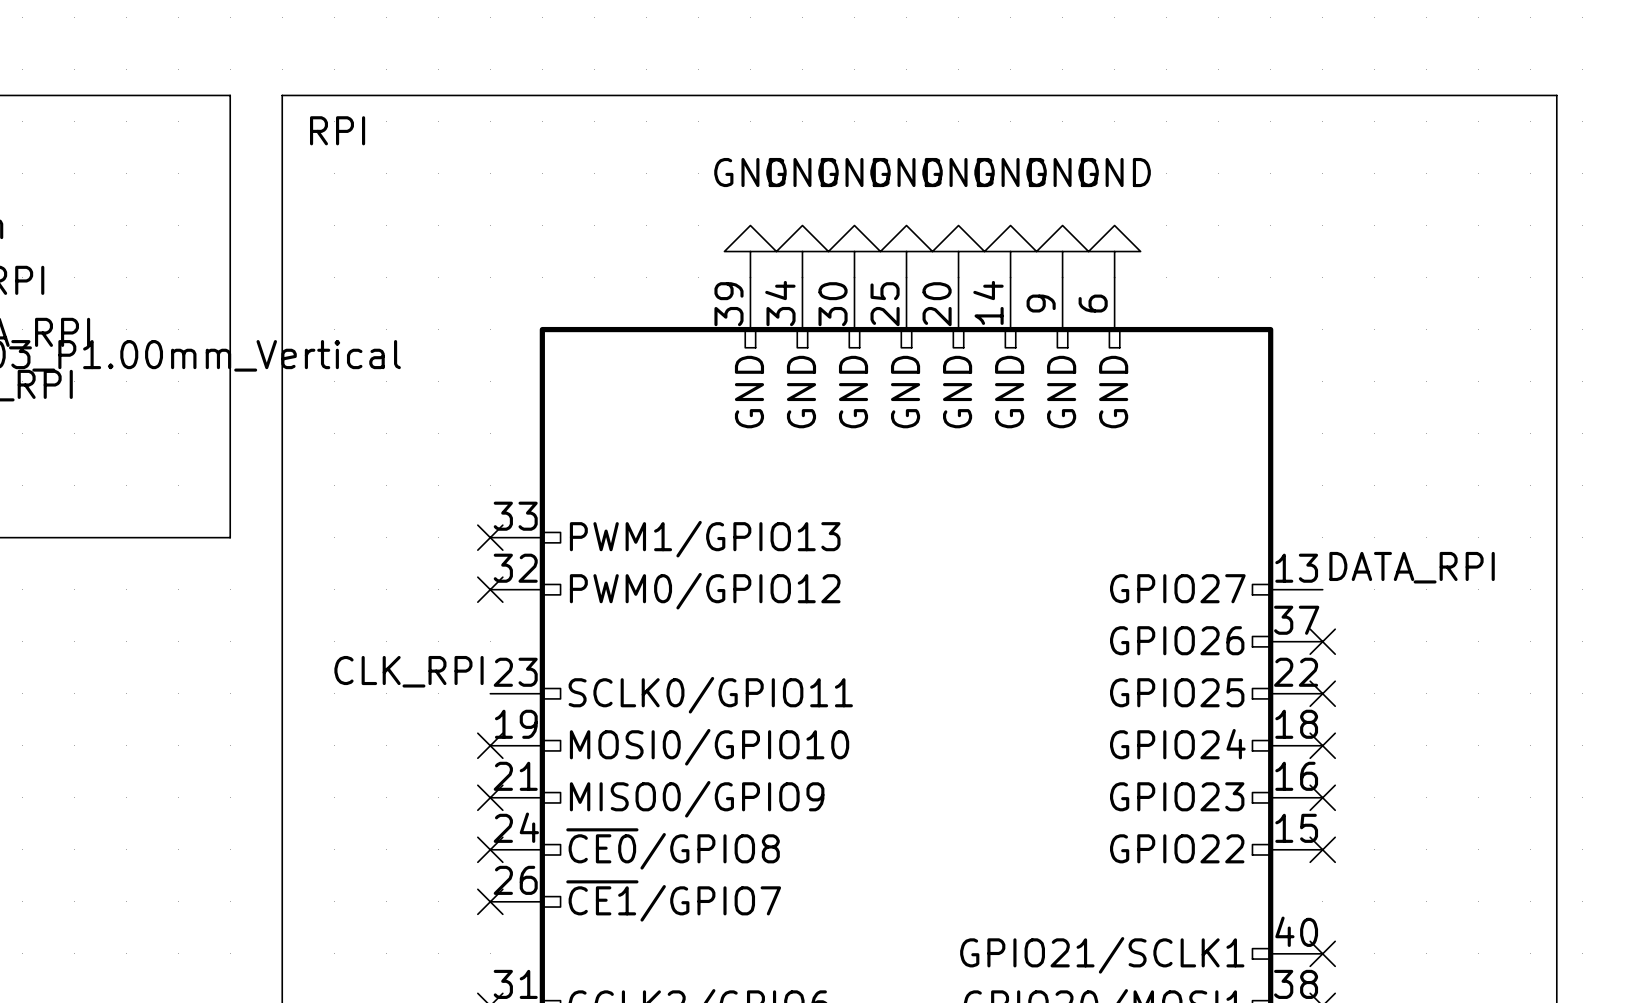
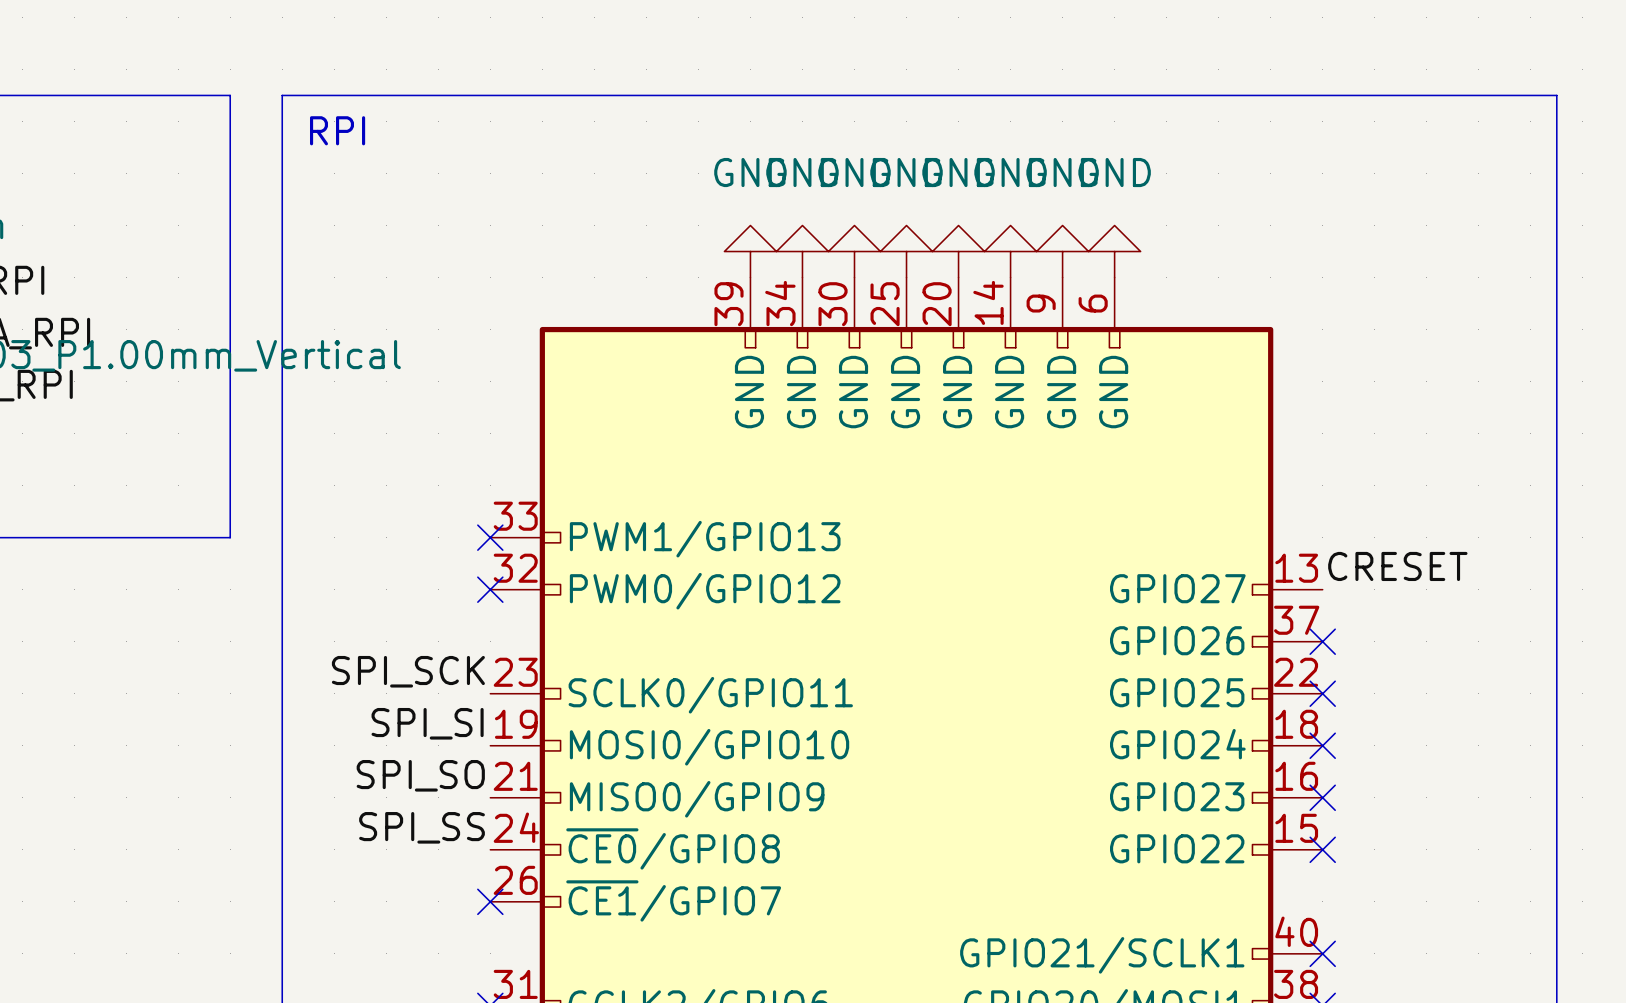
label: DATA_RPI (1412, 567) -> CRESET (1397, 566)
label: CLK_RPI (409, 671) -> SPI_SCK (408, 671)
label: none -> SPI_SI (427, 723)
no-connect mark: (490, 745) -> none
label: none -> SPI_SO (420, 775)
no-connect mark: (490, 797) -> none
label: none -> SPI_SS (422, 827)
no-connect mark: (490, 849) -> none

